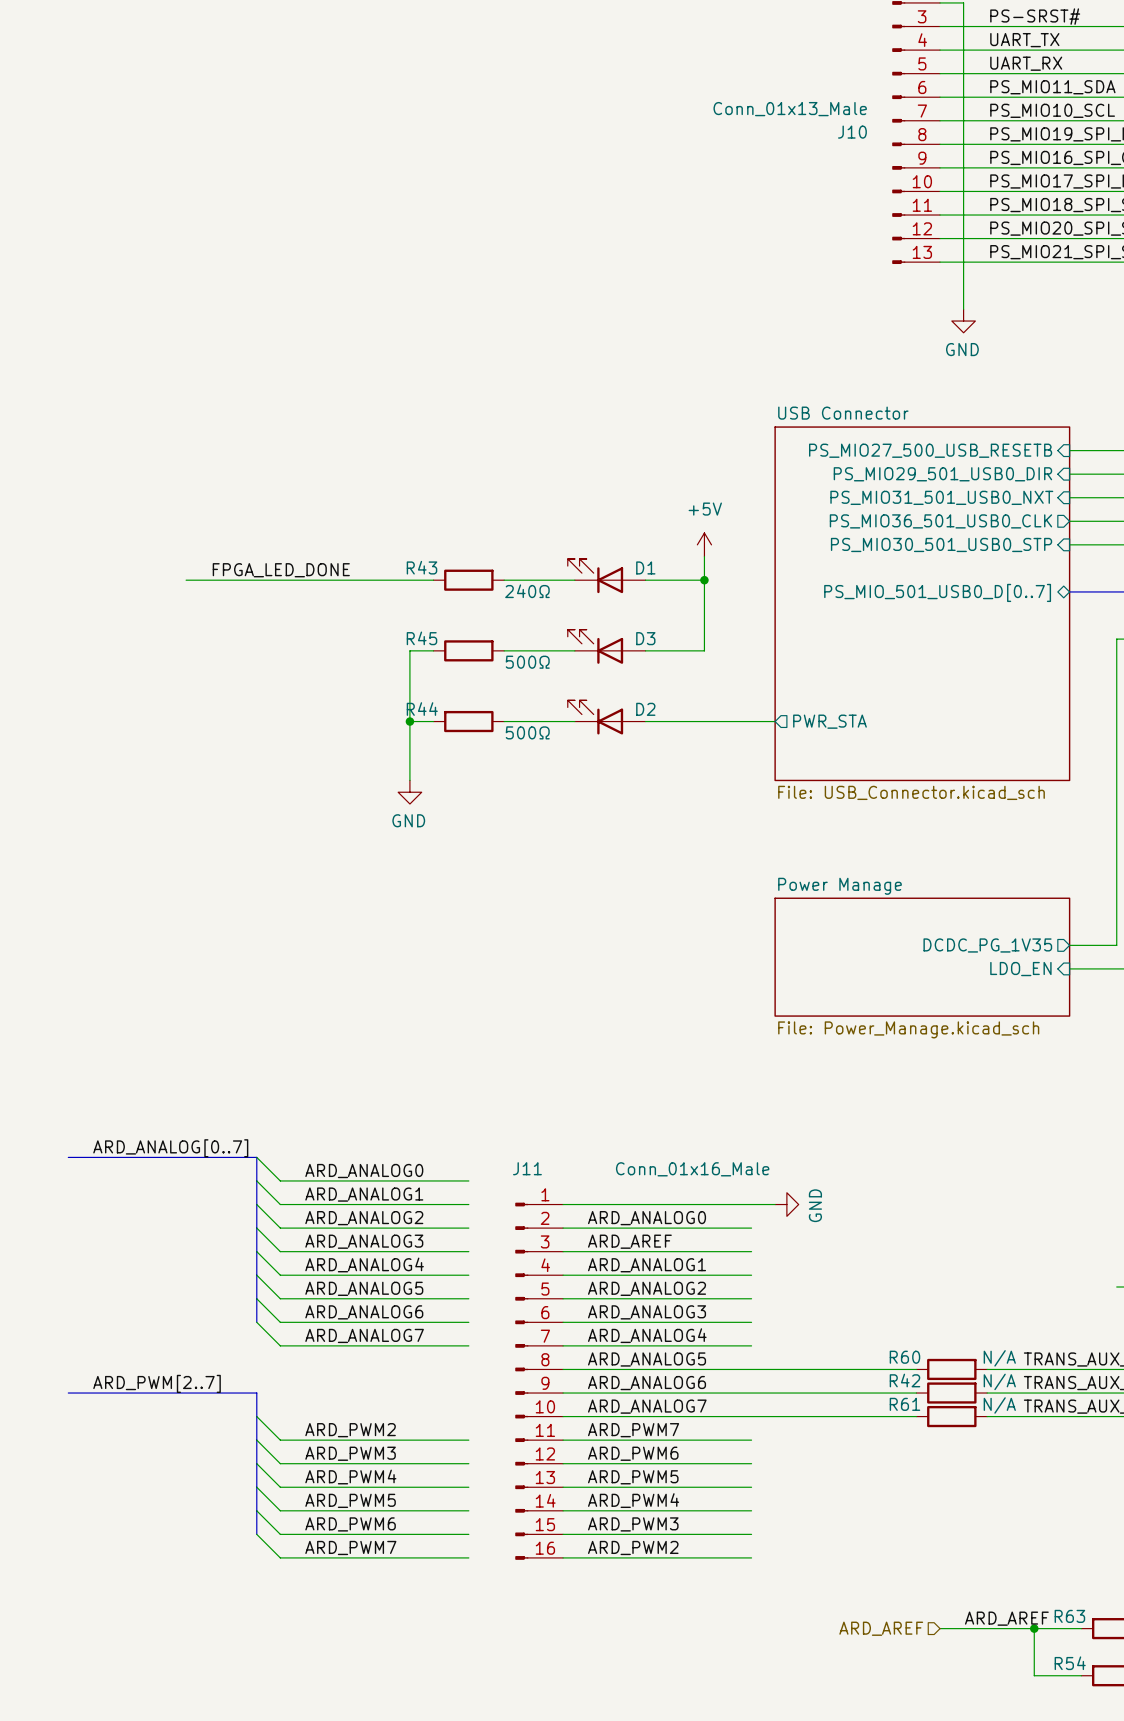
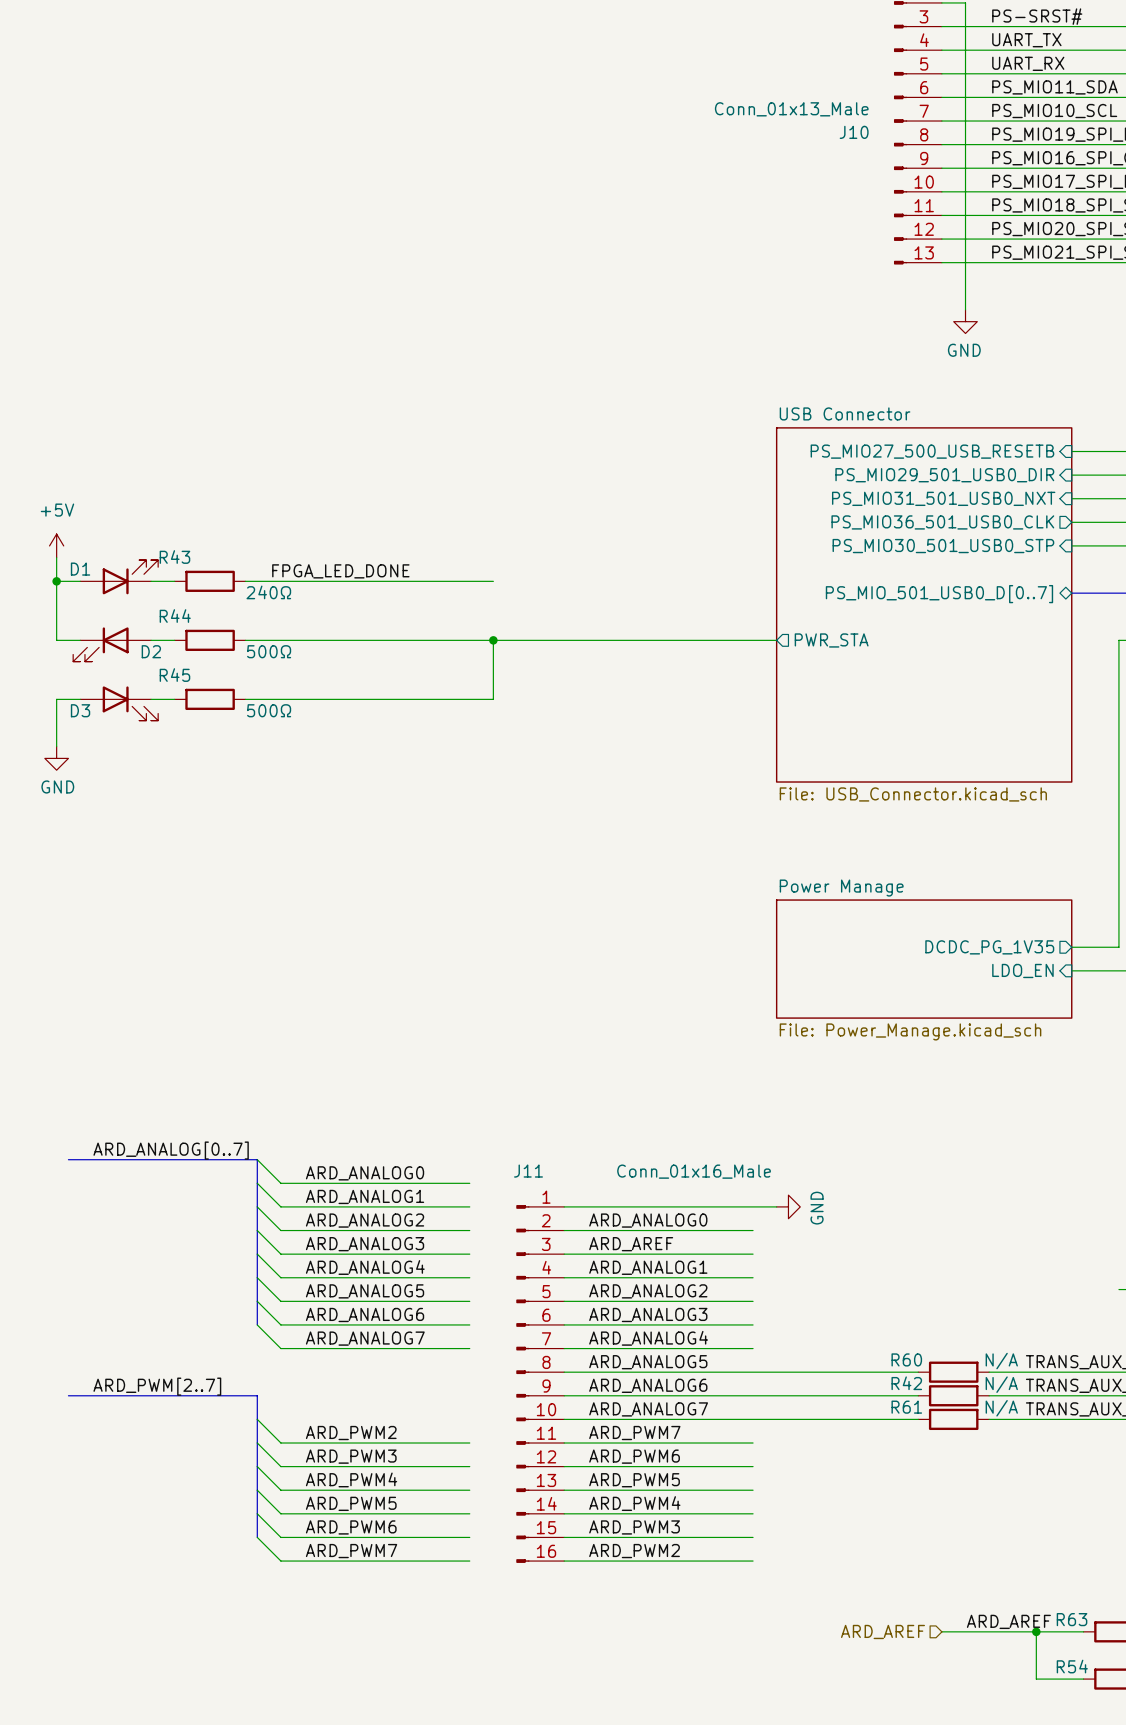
power symbol: none -> +5V (56, 545)
power symbol: +5V (704, 544) -> none
wire: none -> (56, 557) (56, 640) (80, 640)
wire: (704, 556) (704, 650) (645, 650) -> none
R43 name position: R43 (421, 567) -> R43 (174, 557)
label position: FPGA_LED_DONE (281, 570) -> FPGA_LED_DONE (340, 571)
D1 flip: as is (595, 576) -> left-right (130, 577)
D1 position: (606, 576) -> (119, 577)
wire: none -> (56, 581) (80, 581)
junction: none -> (56, 581)
wire: none -> (151, 581) (174, 581)
wire: (186, 580) (245, 580) -> none
R43 position: (468, 580) -> (210, 581)
wire: (504, 580) (574, 580) -> none
wire: (645, 580) (704, 580) -> (434, 581) (493, 581)
junction: (704, 580) -> none
R45 name position: R45 (421, 638) -> R45 (174, 675)
wire: none -> (151, 640) (174, 640)
wire: none -> (245, 640) (776, 640)
wire: none -> (493, 640) (493, 699) (245, 699)
junction: none -> (493, 640)
D3 rotation: 0° (595, 646) -> 180° (130, 703)
D3 position: (606, 646) -> (119, 703)
wire: (433, 650) (409, 650) (409, 780) -> none
R45 position: (468, 650) -> (210, 699)
wire: (504, 650) (574, 650) -> none
wire: none -> (80, 699) (56, 699) (56, 746)
wire: none -> (151, 699) (174, 699)
R44 name position: R44 (422, 709) -> R44 (175, 616)
D2 flip: as is (595, 717) -> up-down (100, 644)
D2 position: (606, 717) -> (112, 644)
wire: (409, 721) (433, 721) -> none
junction: (409, 721) -> none
R44 position: (468, 721) -> (210, 640)
wire: (504, 721) (574, 721) -> none
wire: (645, 721) (775, 721) -> none
sheet pin position: PWR_STA (829, 721) -> PWR_STA (831, 640)
power symbol: none -> GND (56, 758)
power symbol: GND (409, 792) -> none

